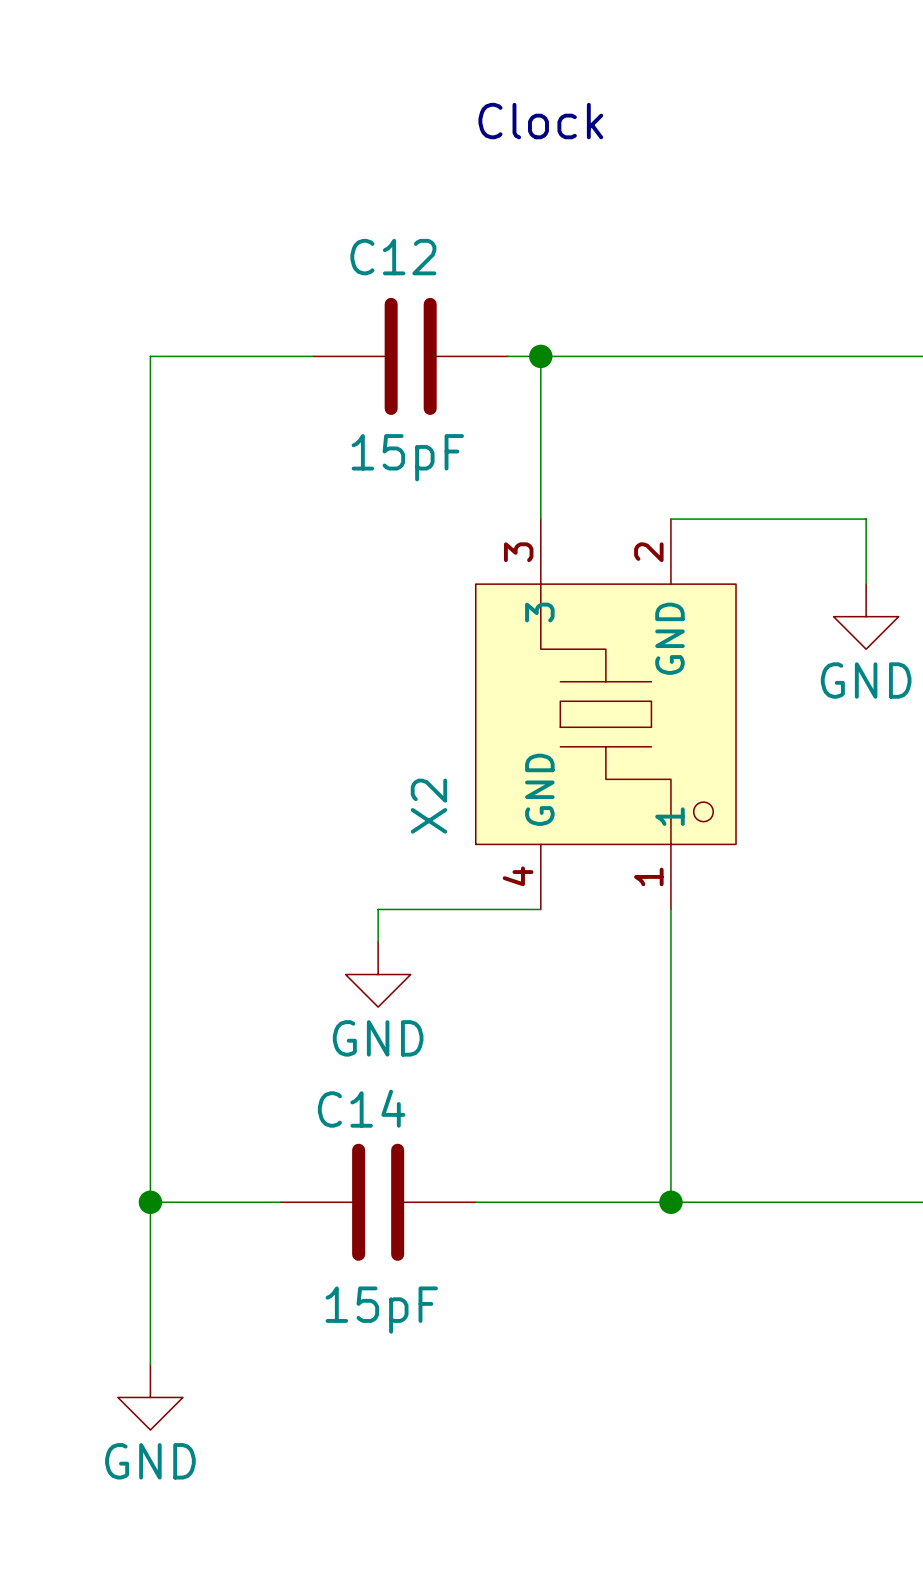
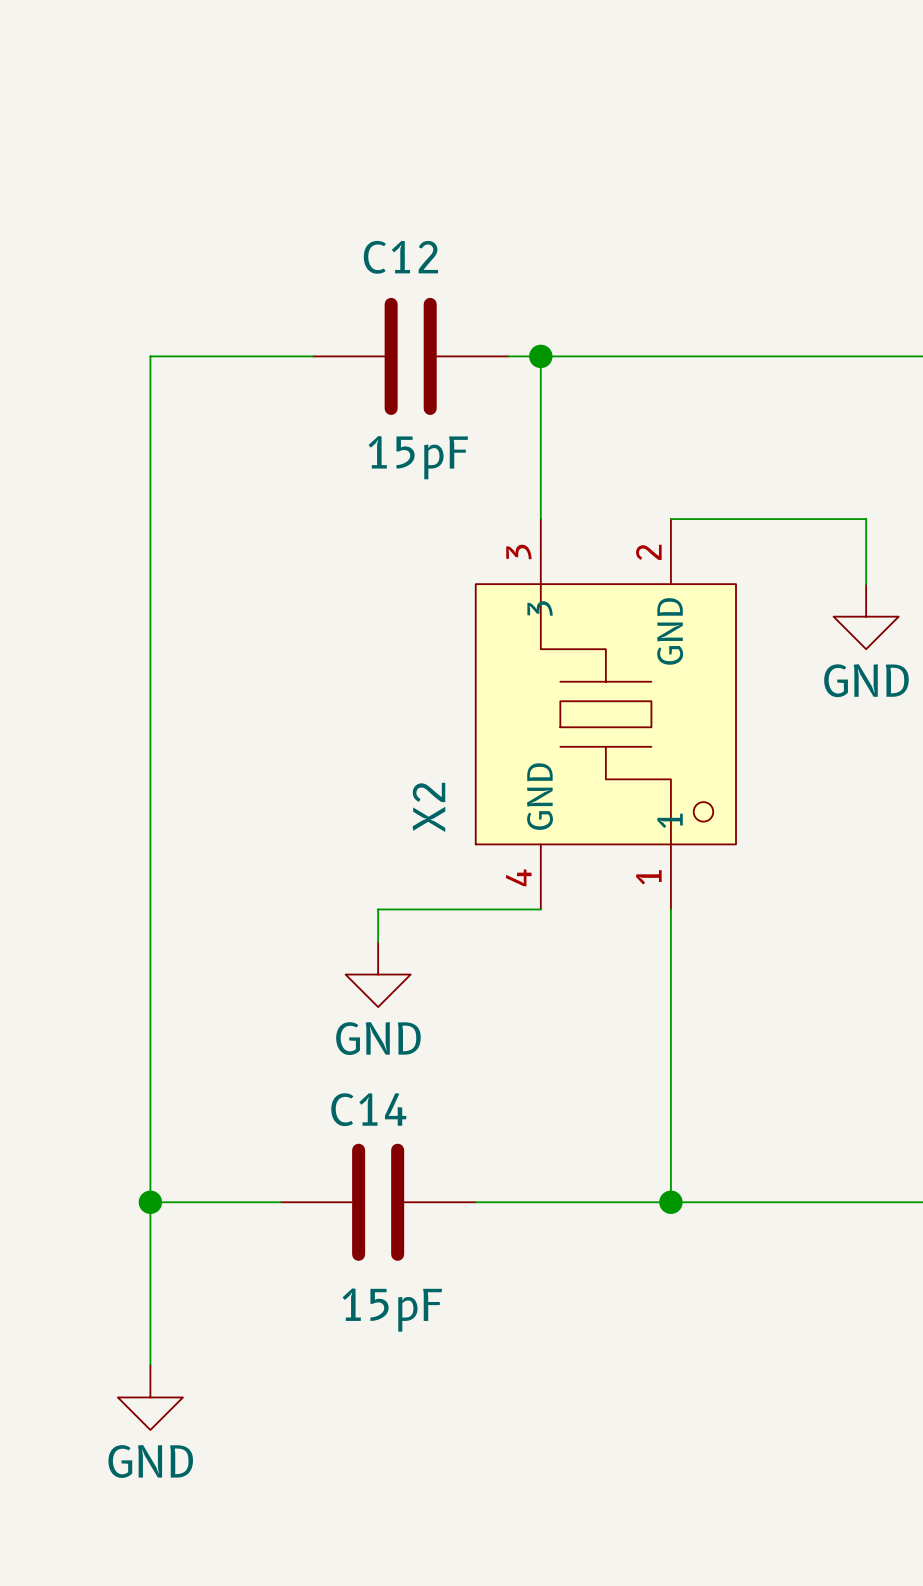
text: Clock (540, 121) -> none

